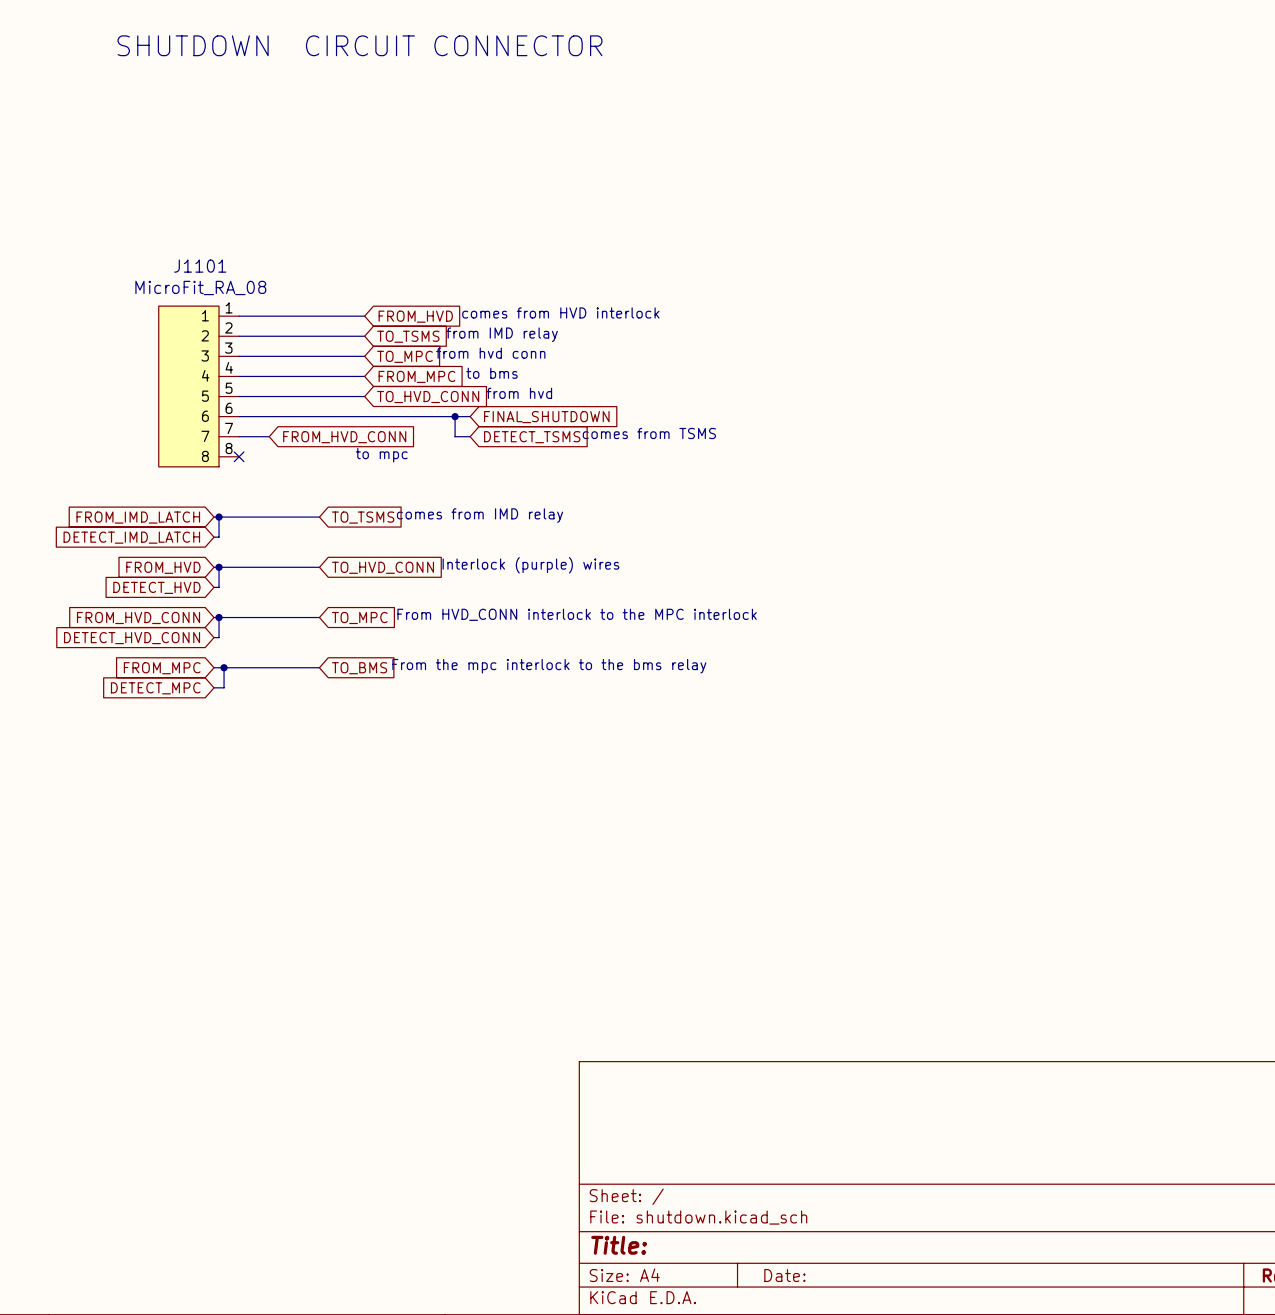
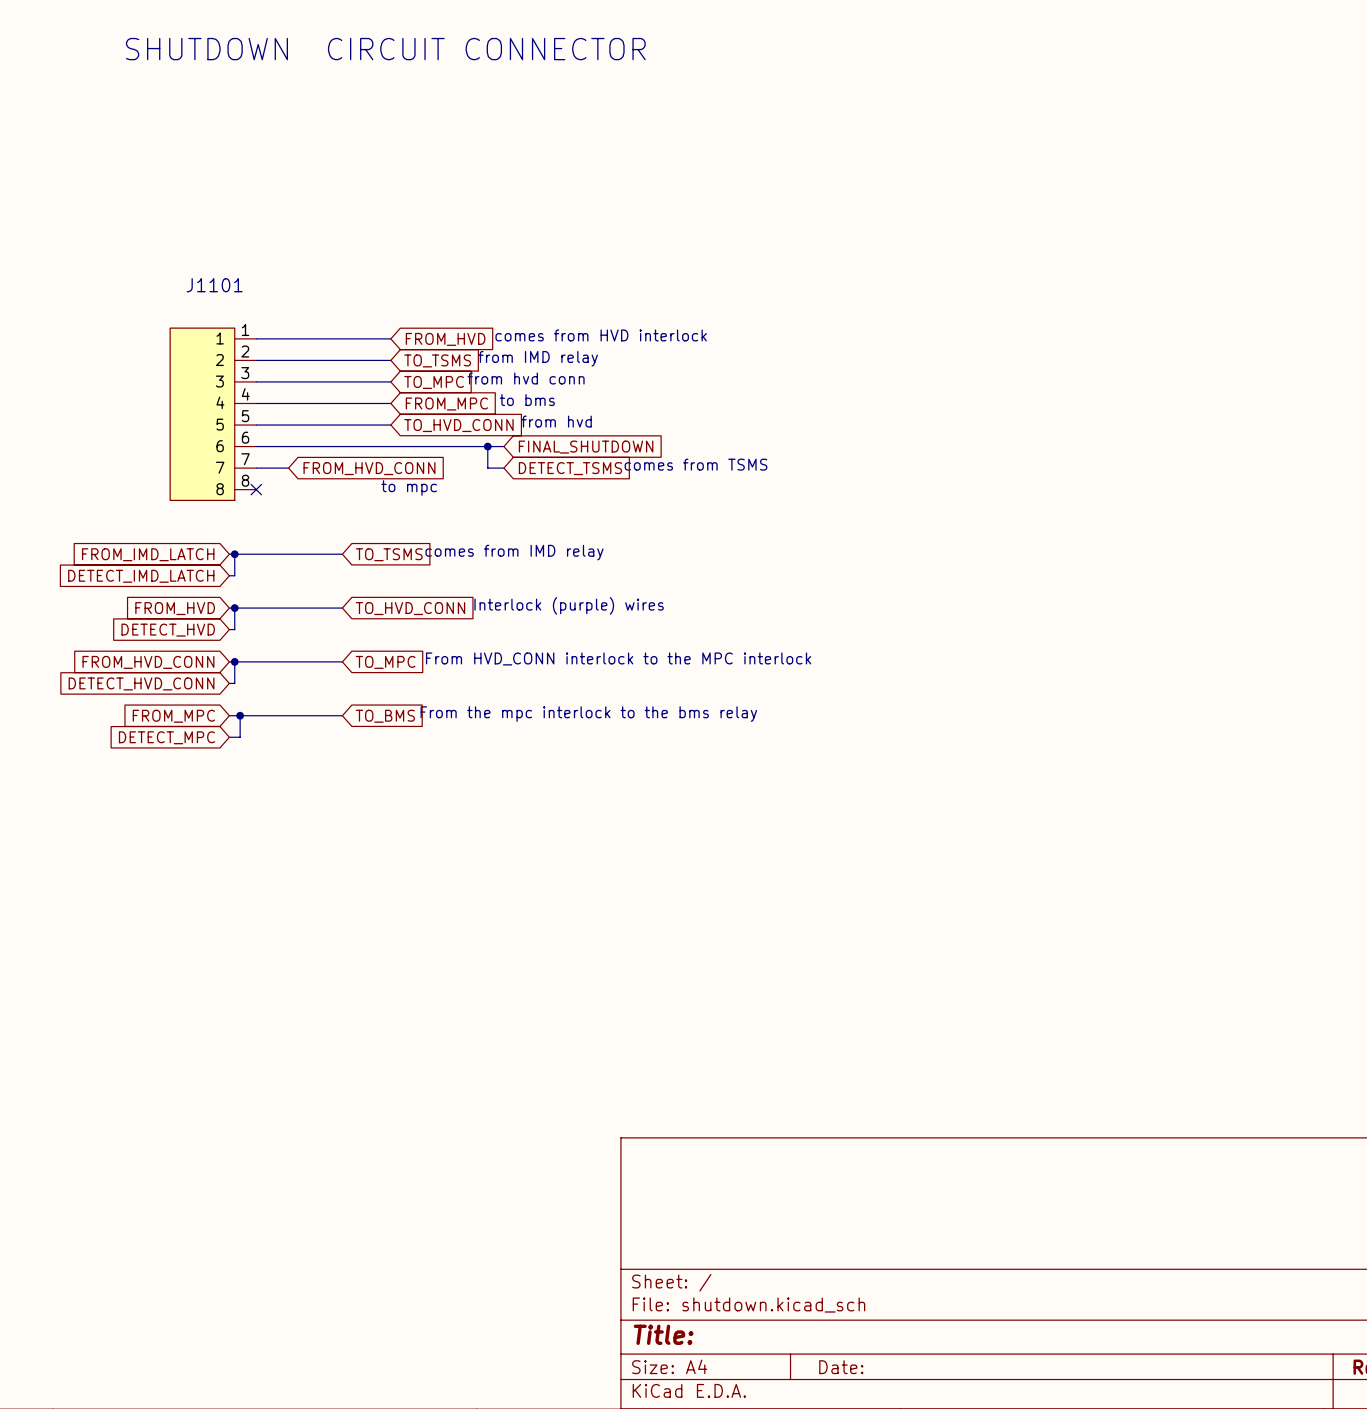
J1101 value: MicroFit_RA_08 (200, 287) -> none

